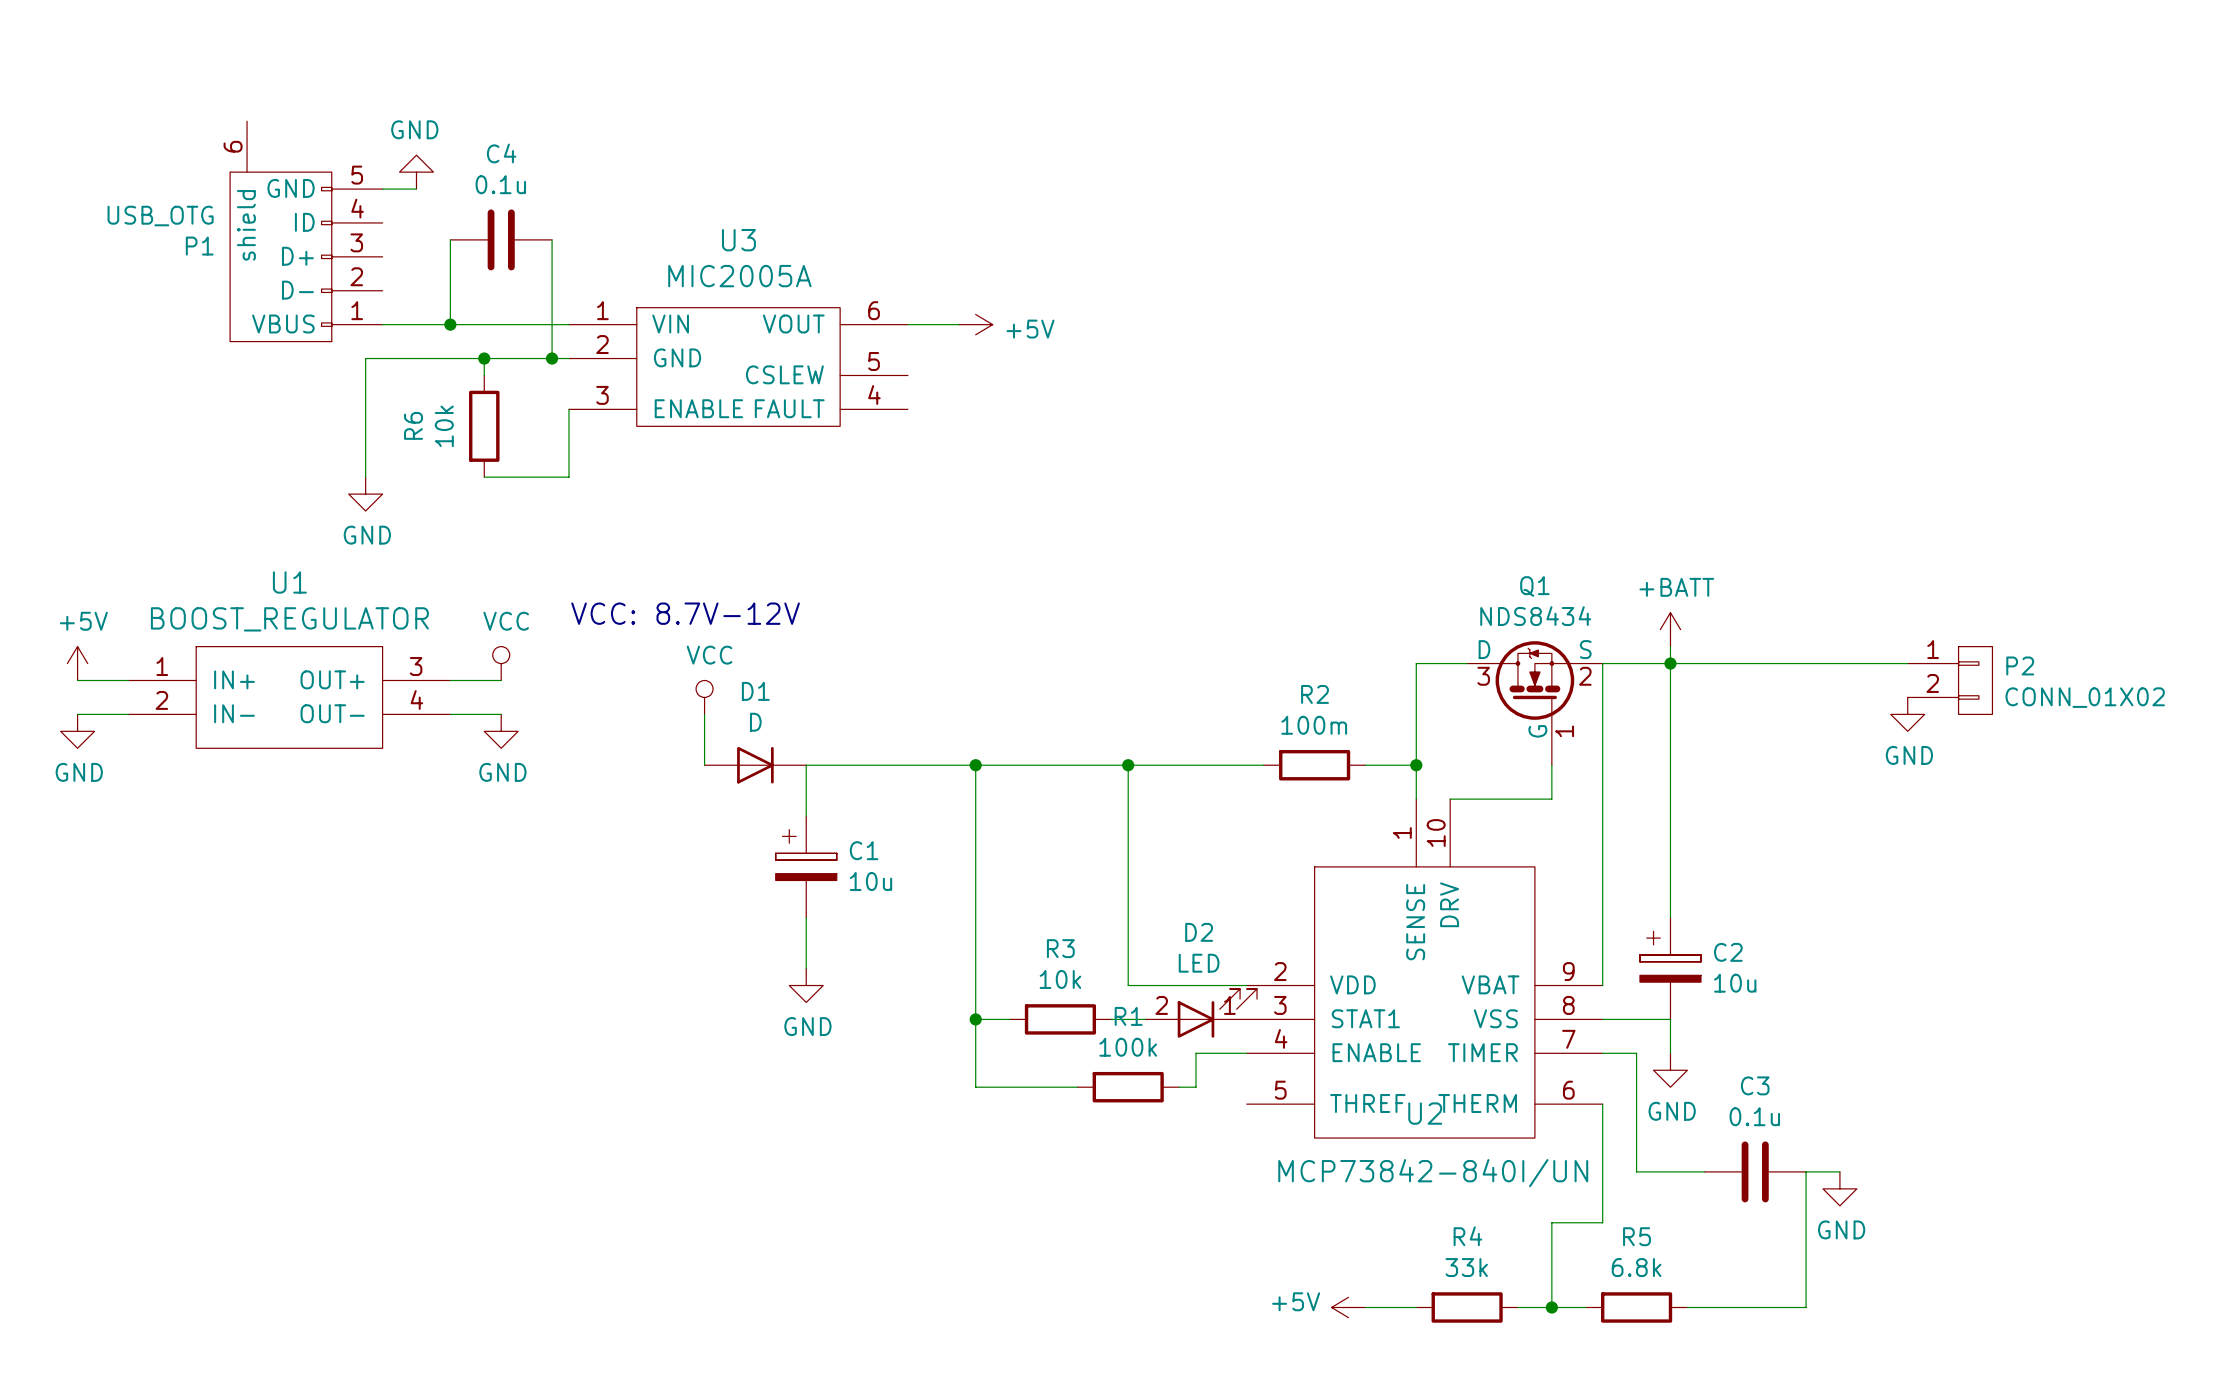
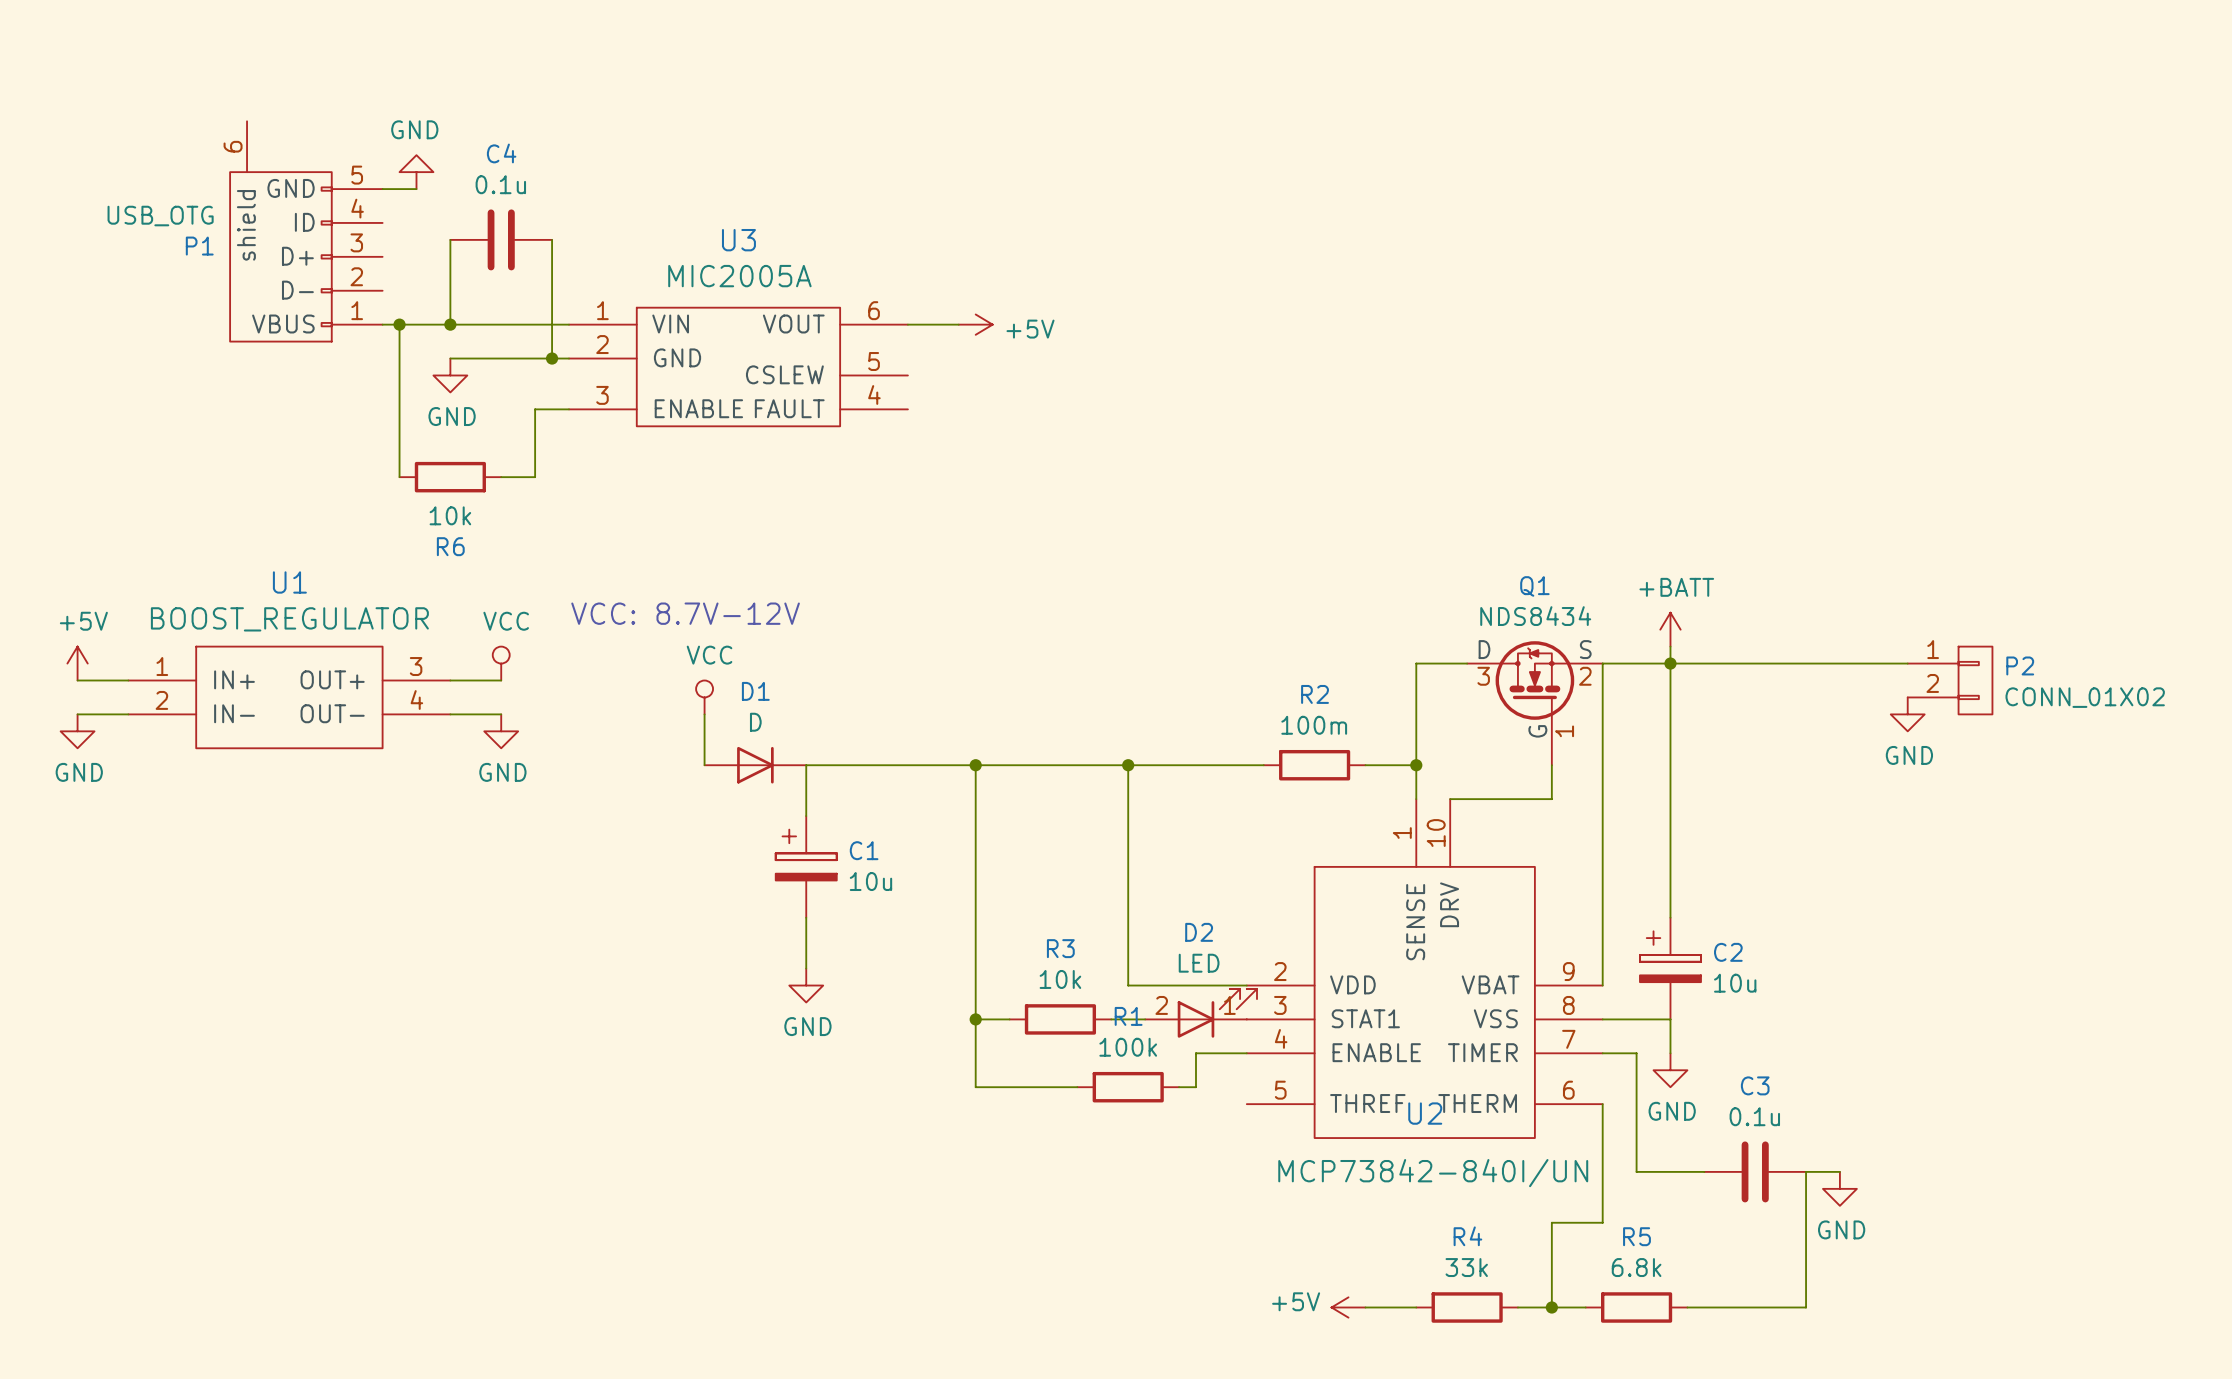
wire: none -> (399, 324) (399, 477)
junction: none -> (399, 324)
wire: (450, 358) (365, 358) (365, 477) -> none
wire: (484, 358) (484, 375) -> none
junction: (484, 358) -> none
wire: (569, 409) (569, 477) (535, 477) -> (569, 409) (535, 409) (535, 477)
R6 name position: R6 (413, 425) -> R6 (450, 546)
R6 value position: 10k (444, 426) -> 10k (450, 515)
R6 rotation: 0° (484, 426) -> 90° clockwise (450, 477)
R6 position: (484, 426) -> (450, 477)
power symbol position: GND (365, 494) -> GND (450, 375)

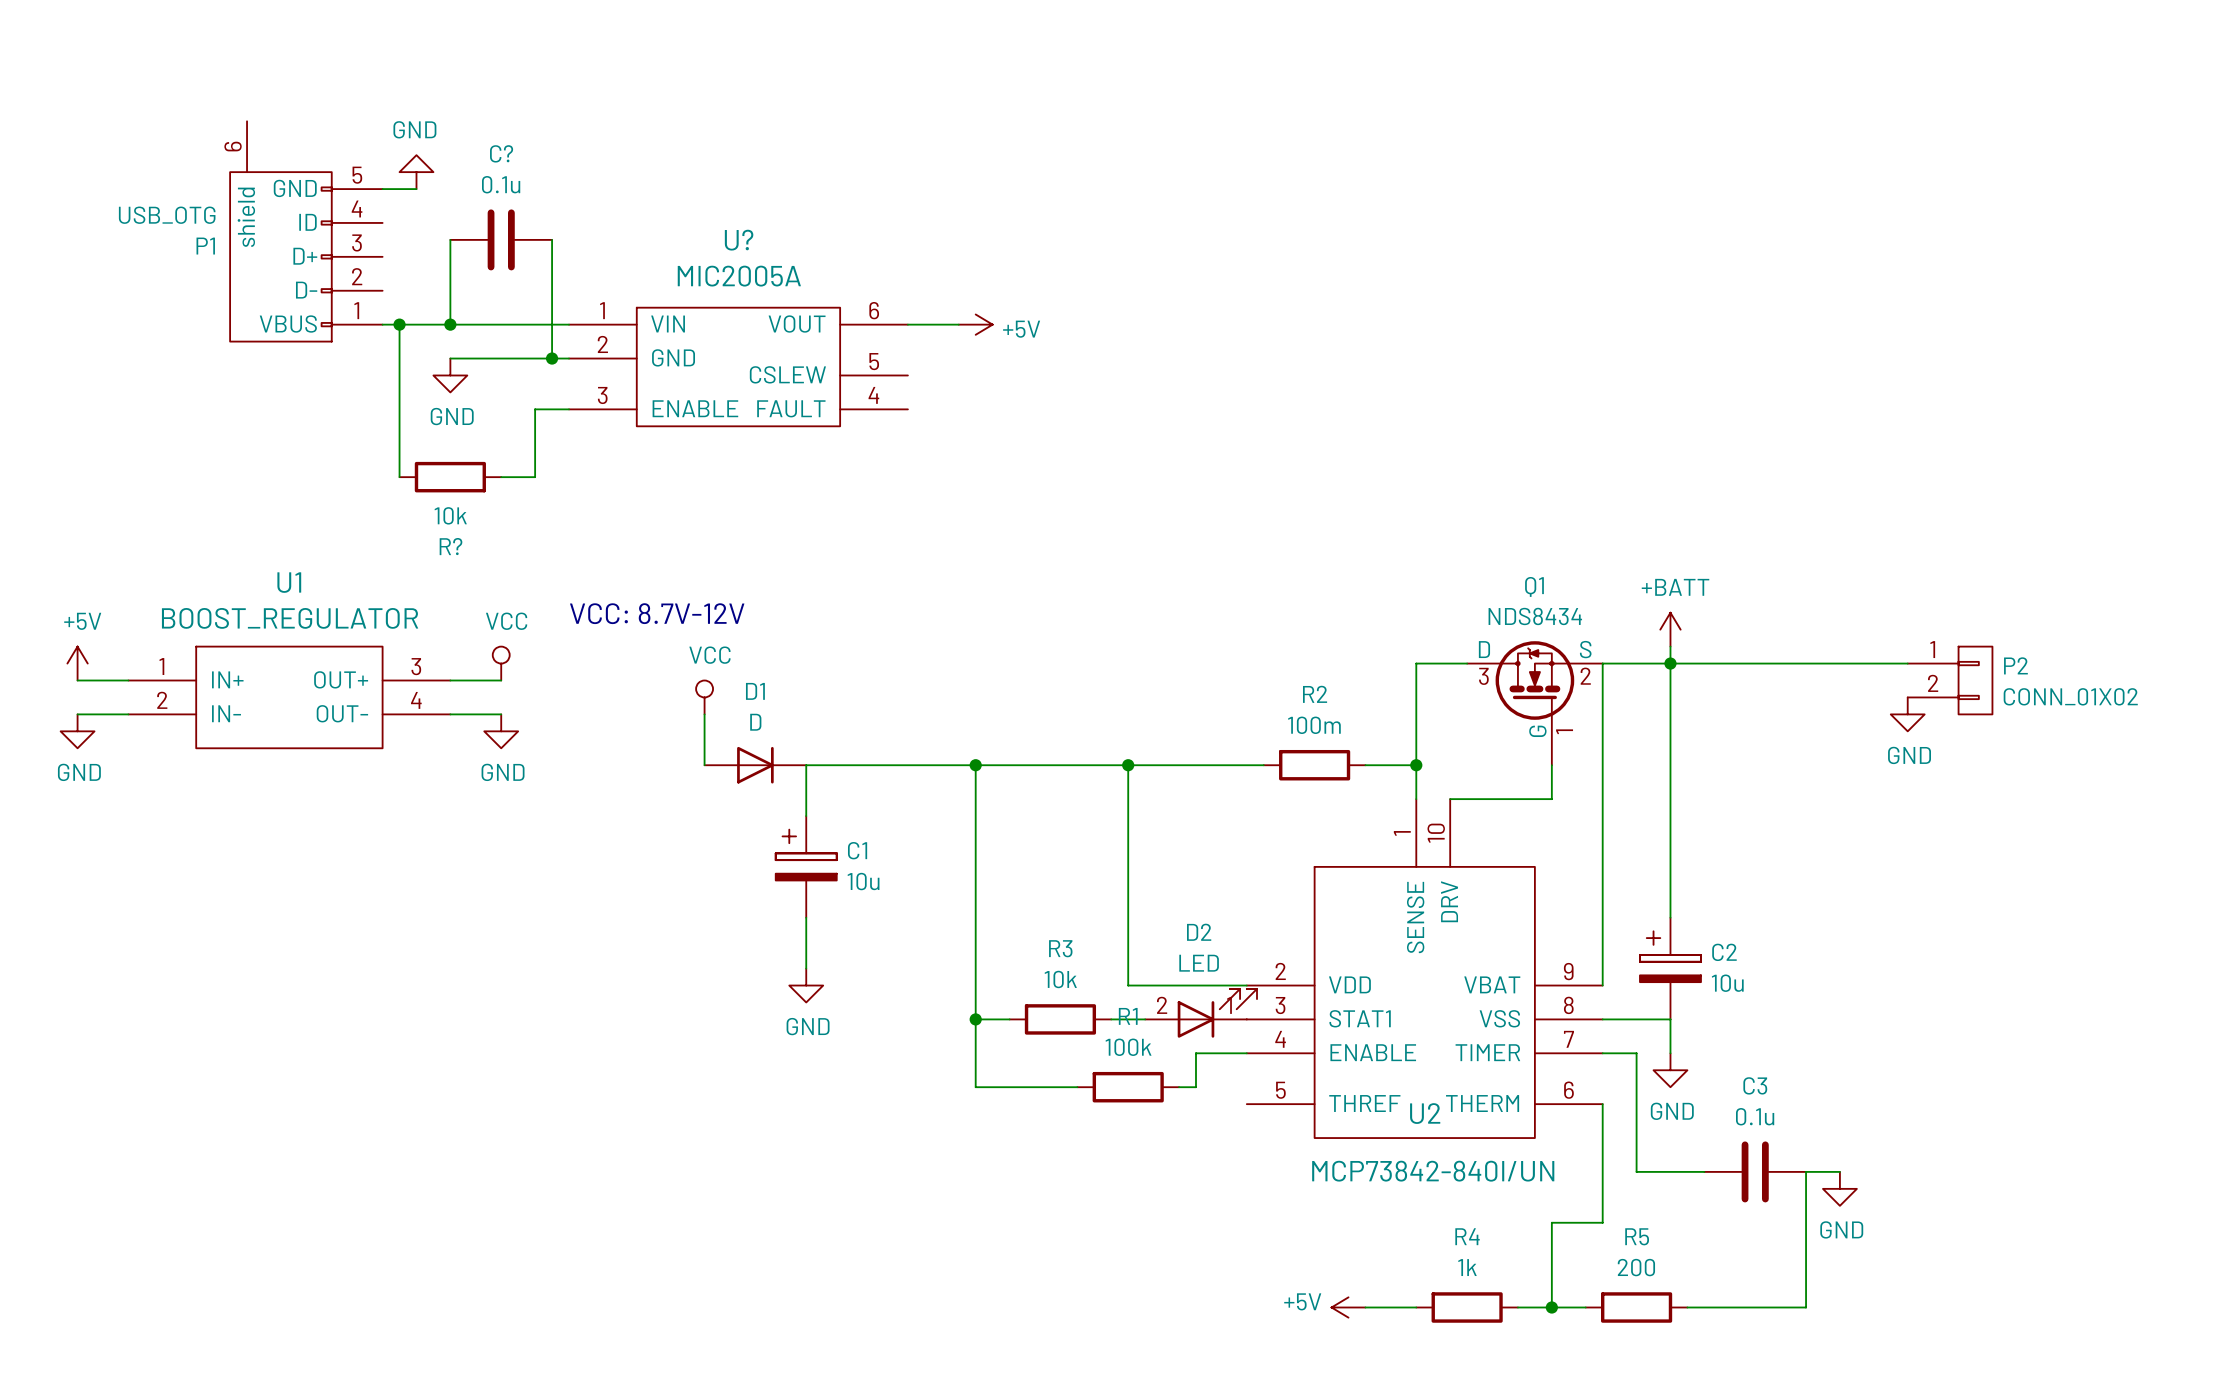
C4 name: C4 (501, 153) -> C? (501, 153)
U3 name: U3 (738, 240) -> U? (739, 240)
R6 name: R6 (450, 546) -> R? (451, 546)
R4 value: 33k (1466, 1267) -> 1k (1467, 1267)
R5 value: 6.8k (1636, 1267) -> 200 (1636, 1267)

